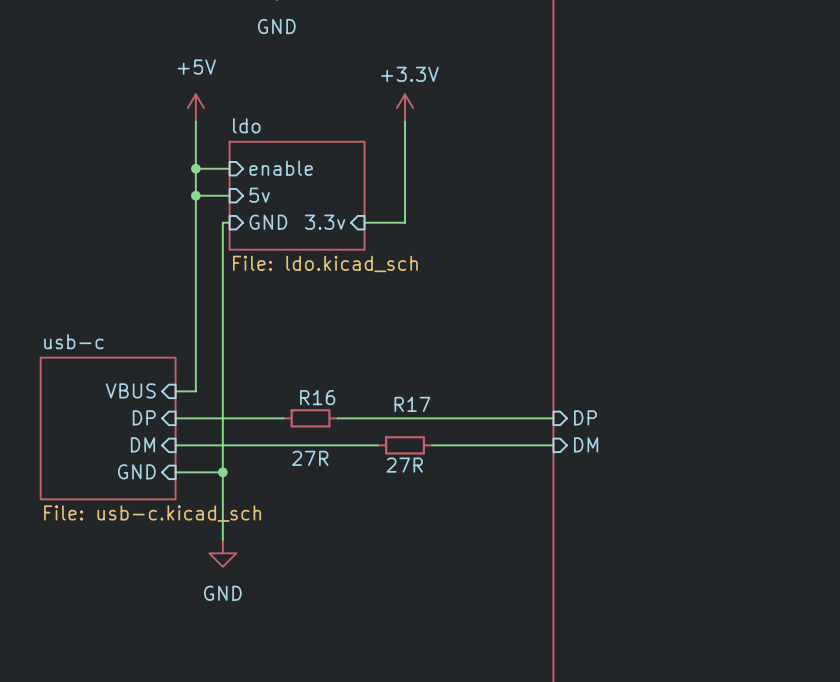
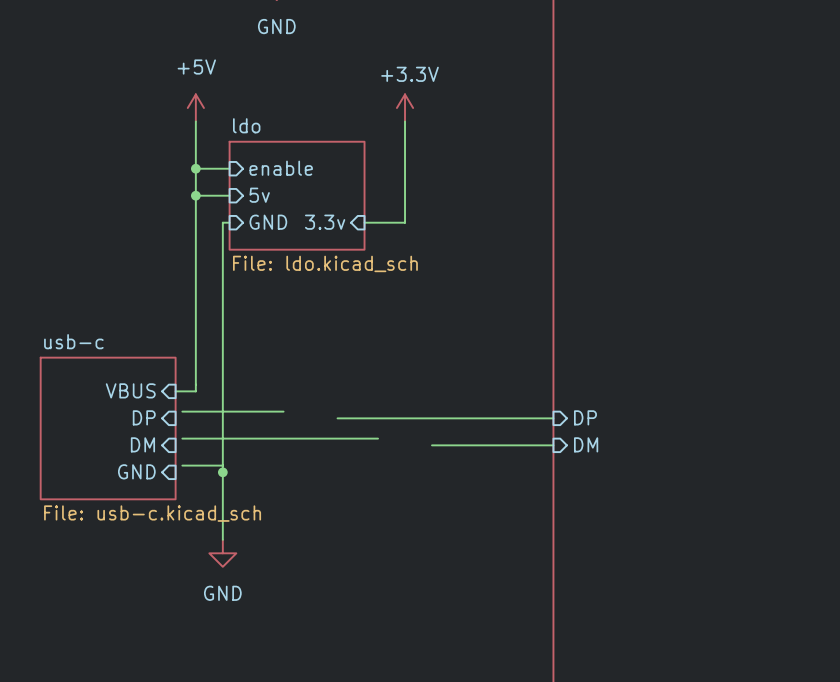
wire: none -> (182, 411) (283, 411)
wire: (175, 418) (283, 418) -> none
R16: 27R (310, 418) -> none
wire: none -> (182, 438) (378, 438)
wire: (175, 445) (378, 445) -> none
R17: 27R (405, 445) -> none
wire: none -> (182, 465) (222, 465)
wire: (175, 472) (222, 472) -> none

